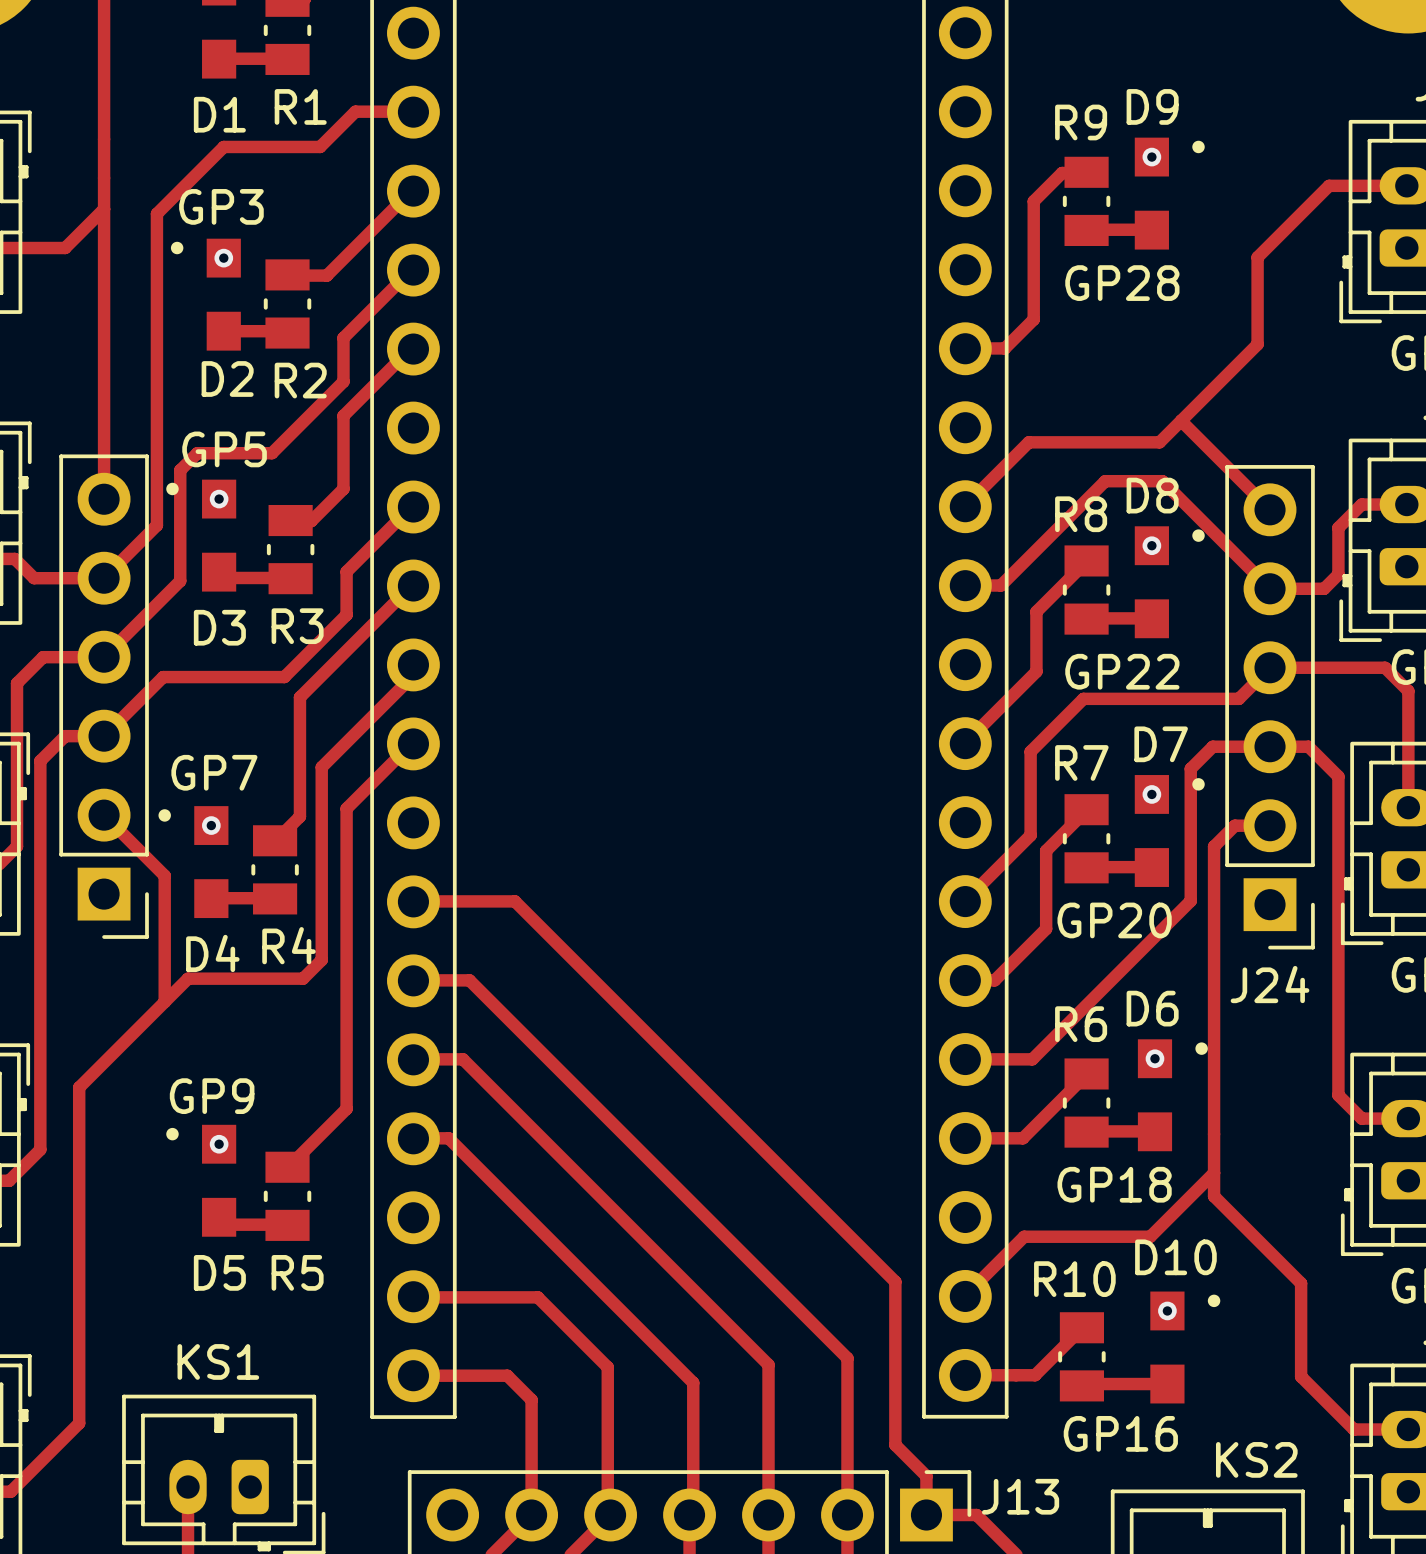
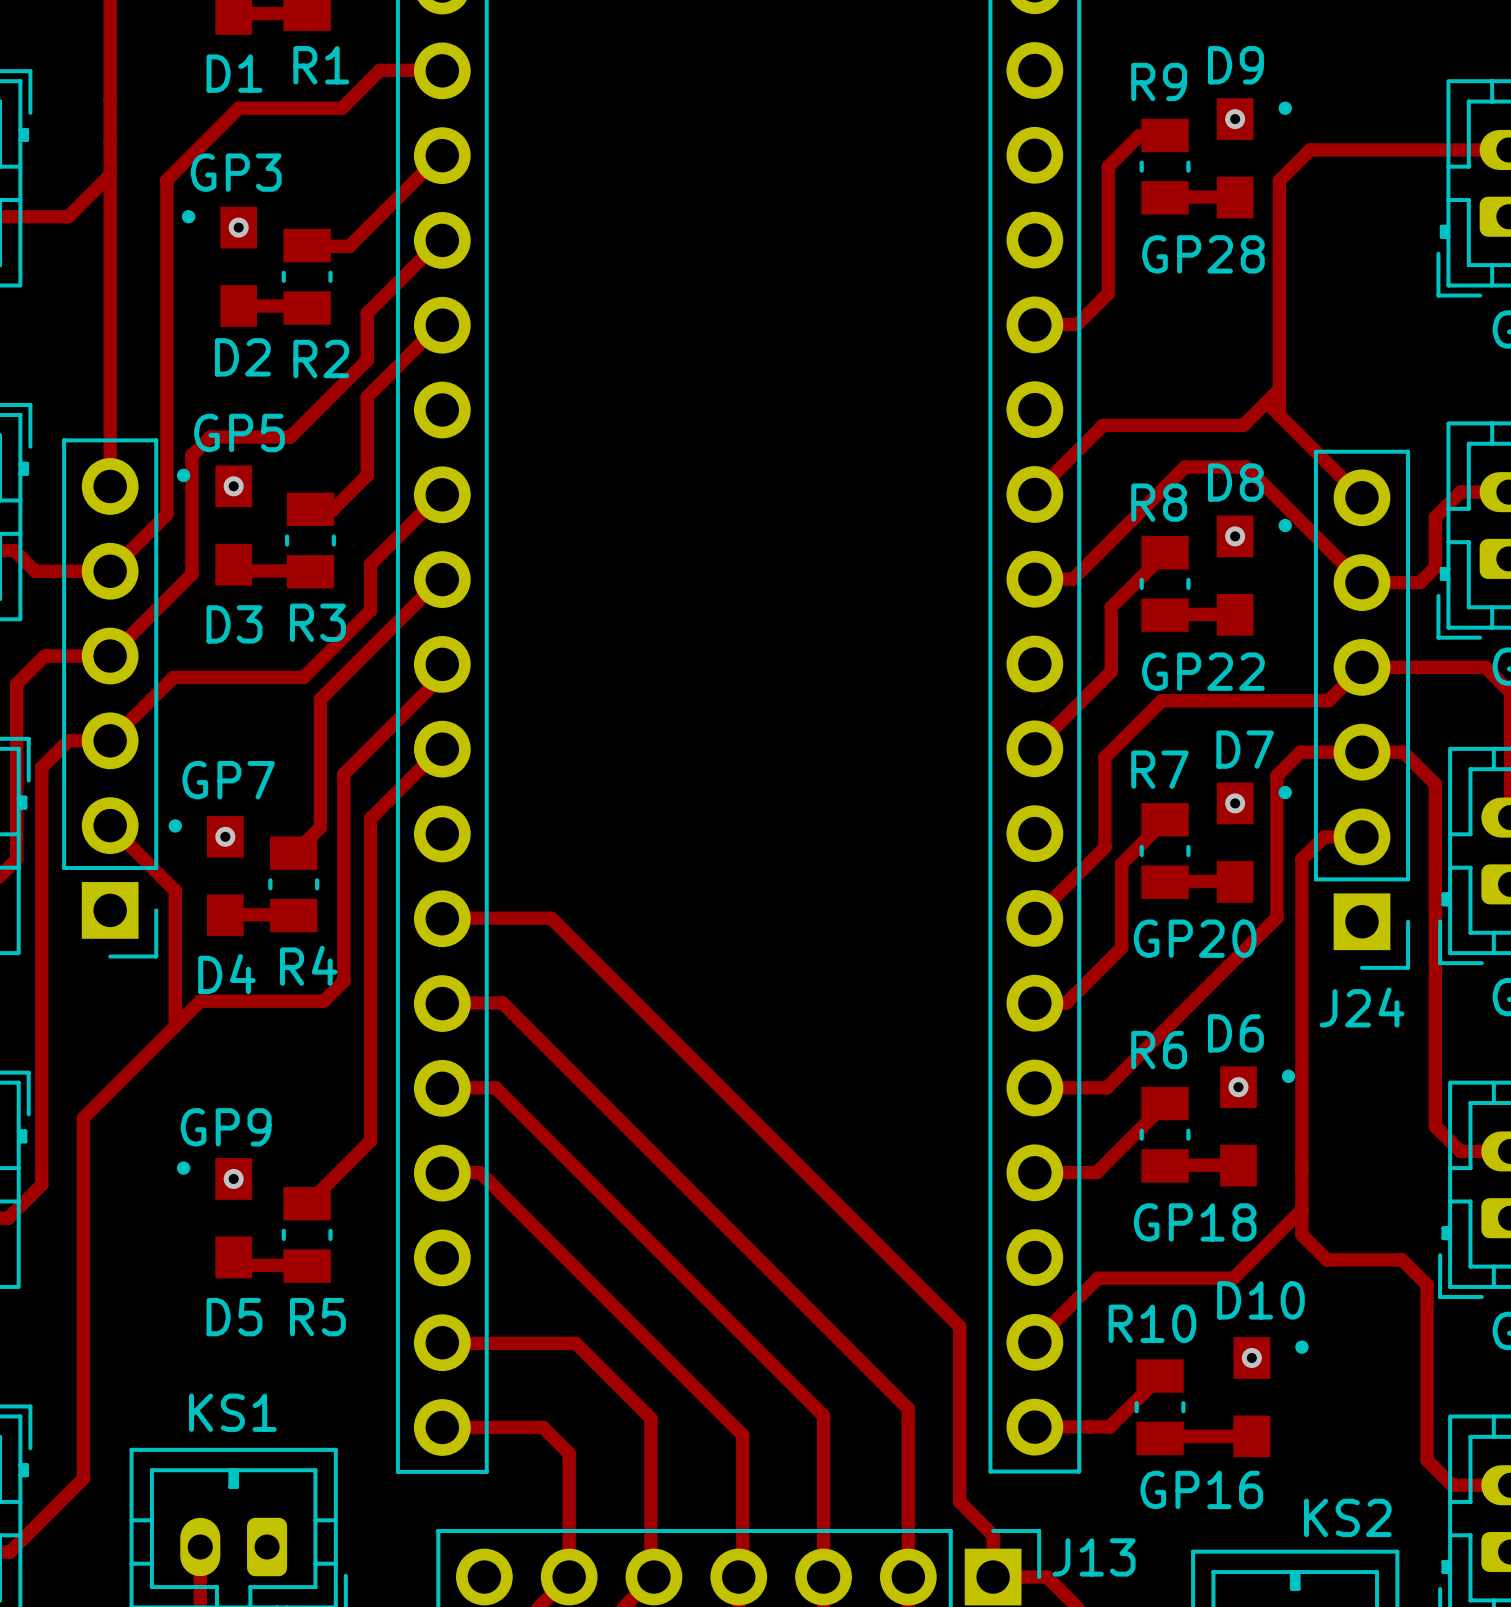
track: (1329, 185) (1257, 257) (1257, 344) (1193, 408) -> (1425, 149) (1310, 149) (1279, 180) (1279, 415)
track: (1237, 1219) (1301, 1283) (1301, 1376) (1330, 1406) -> (1326, 1259) (1402, 1259) (1427, 1284) (1427, 1460)

